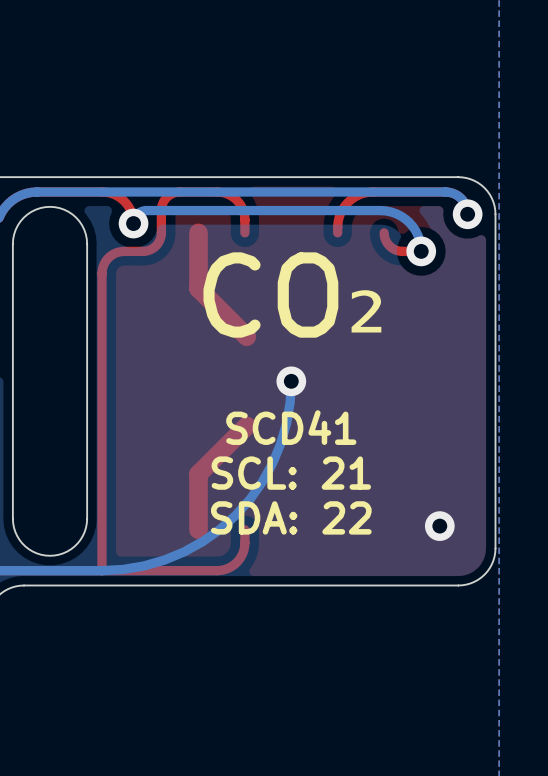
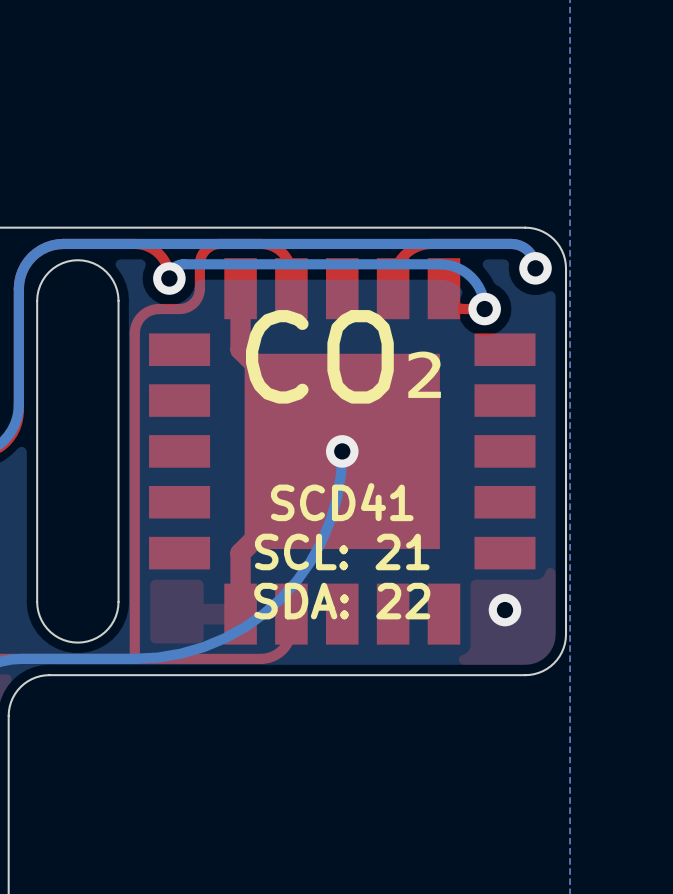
part: none -> (342, 451)

